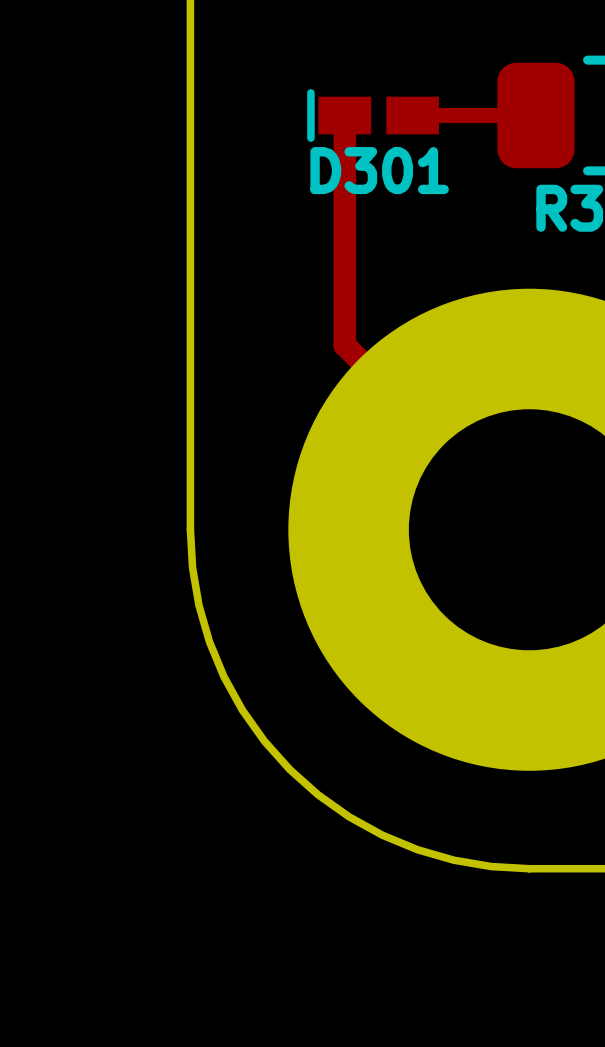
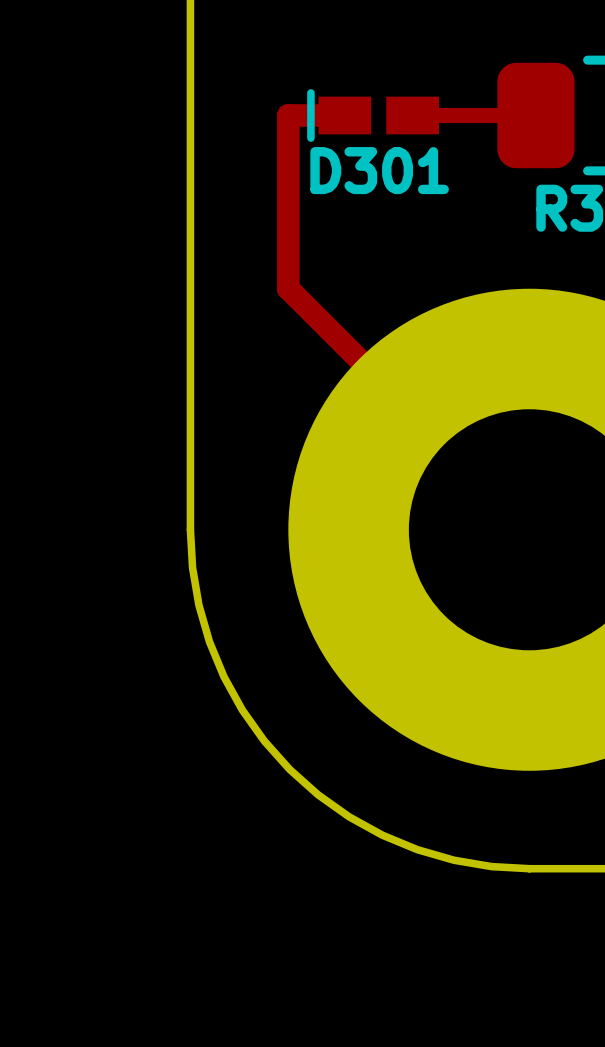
track: (344, 115) (344, 345) -> (344, 115) (288, 115) (288, 288) (344, 345)

